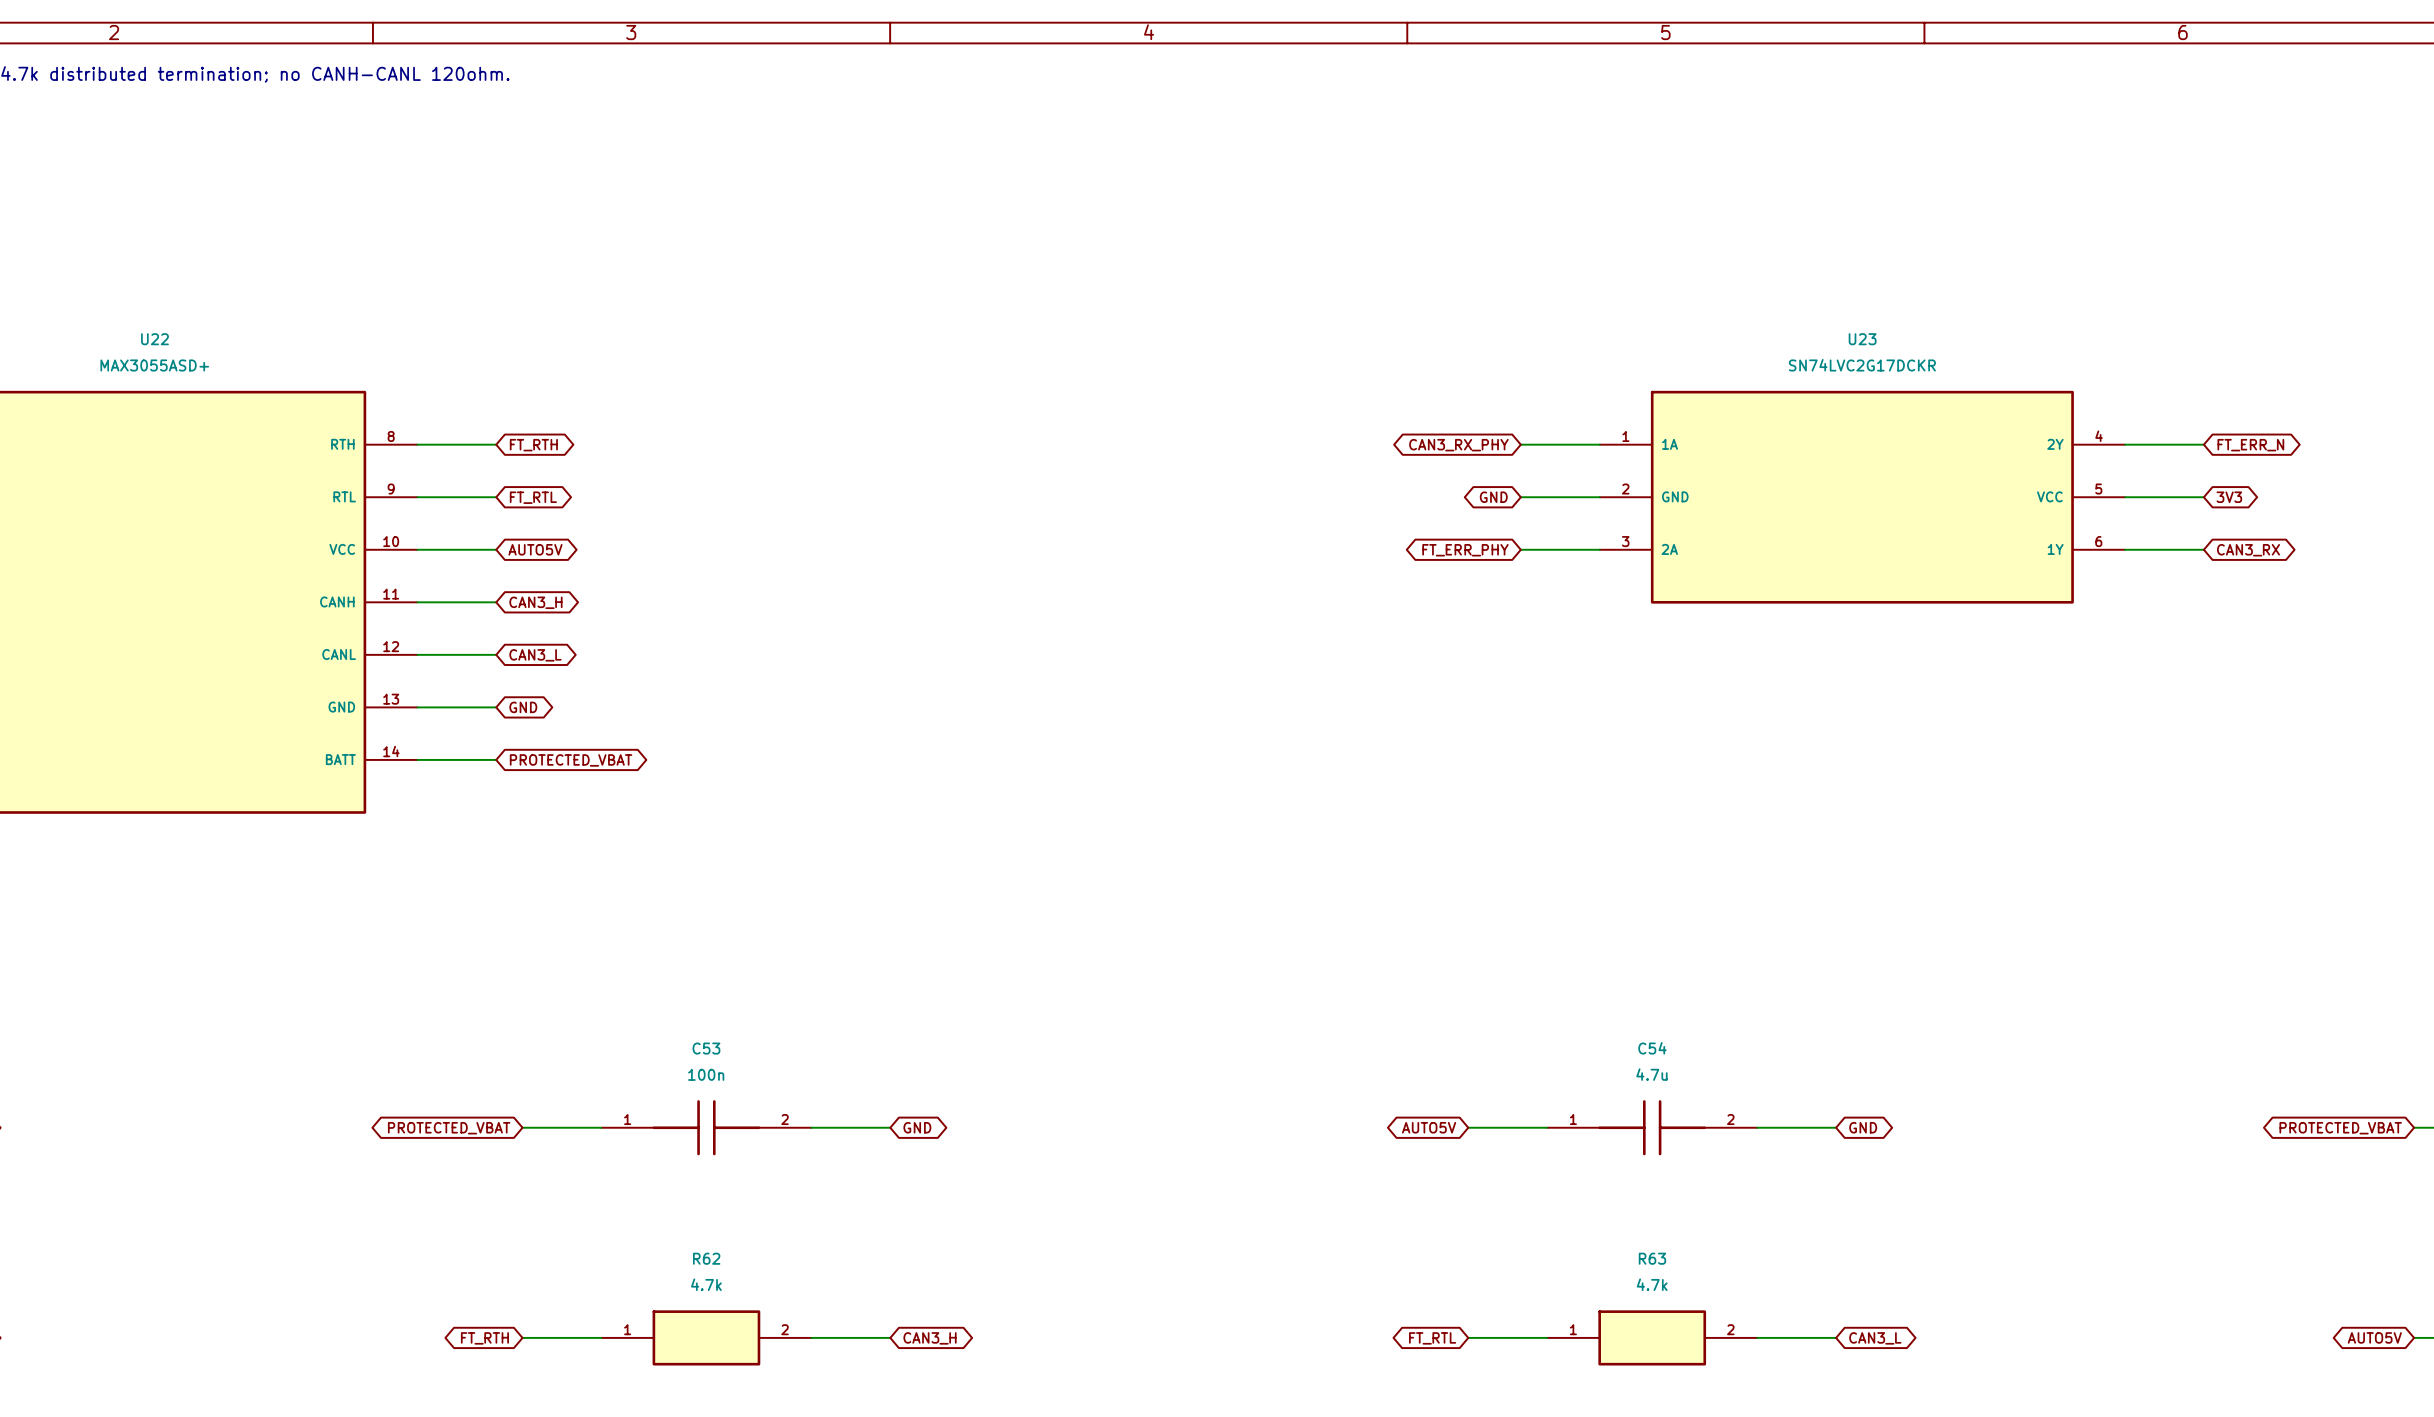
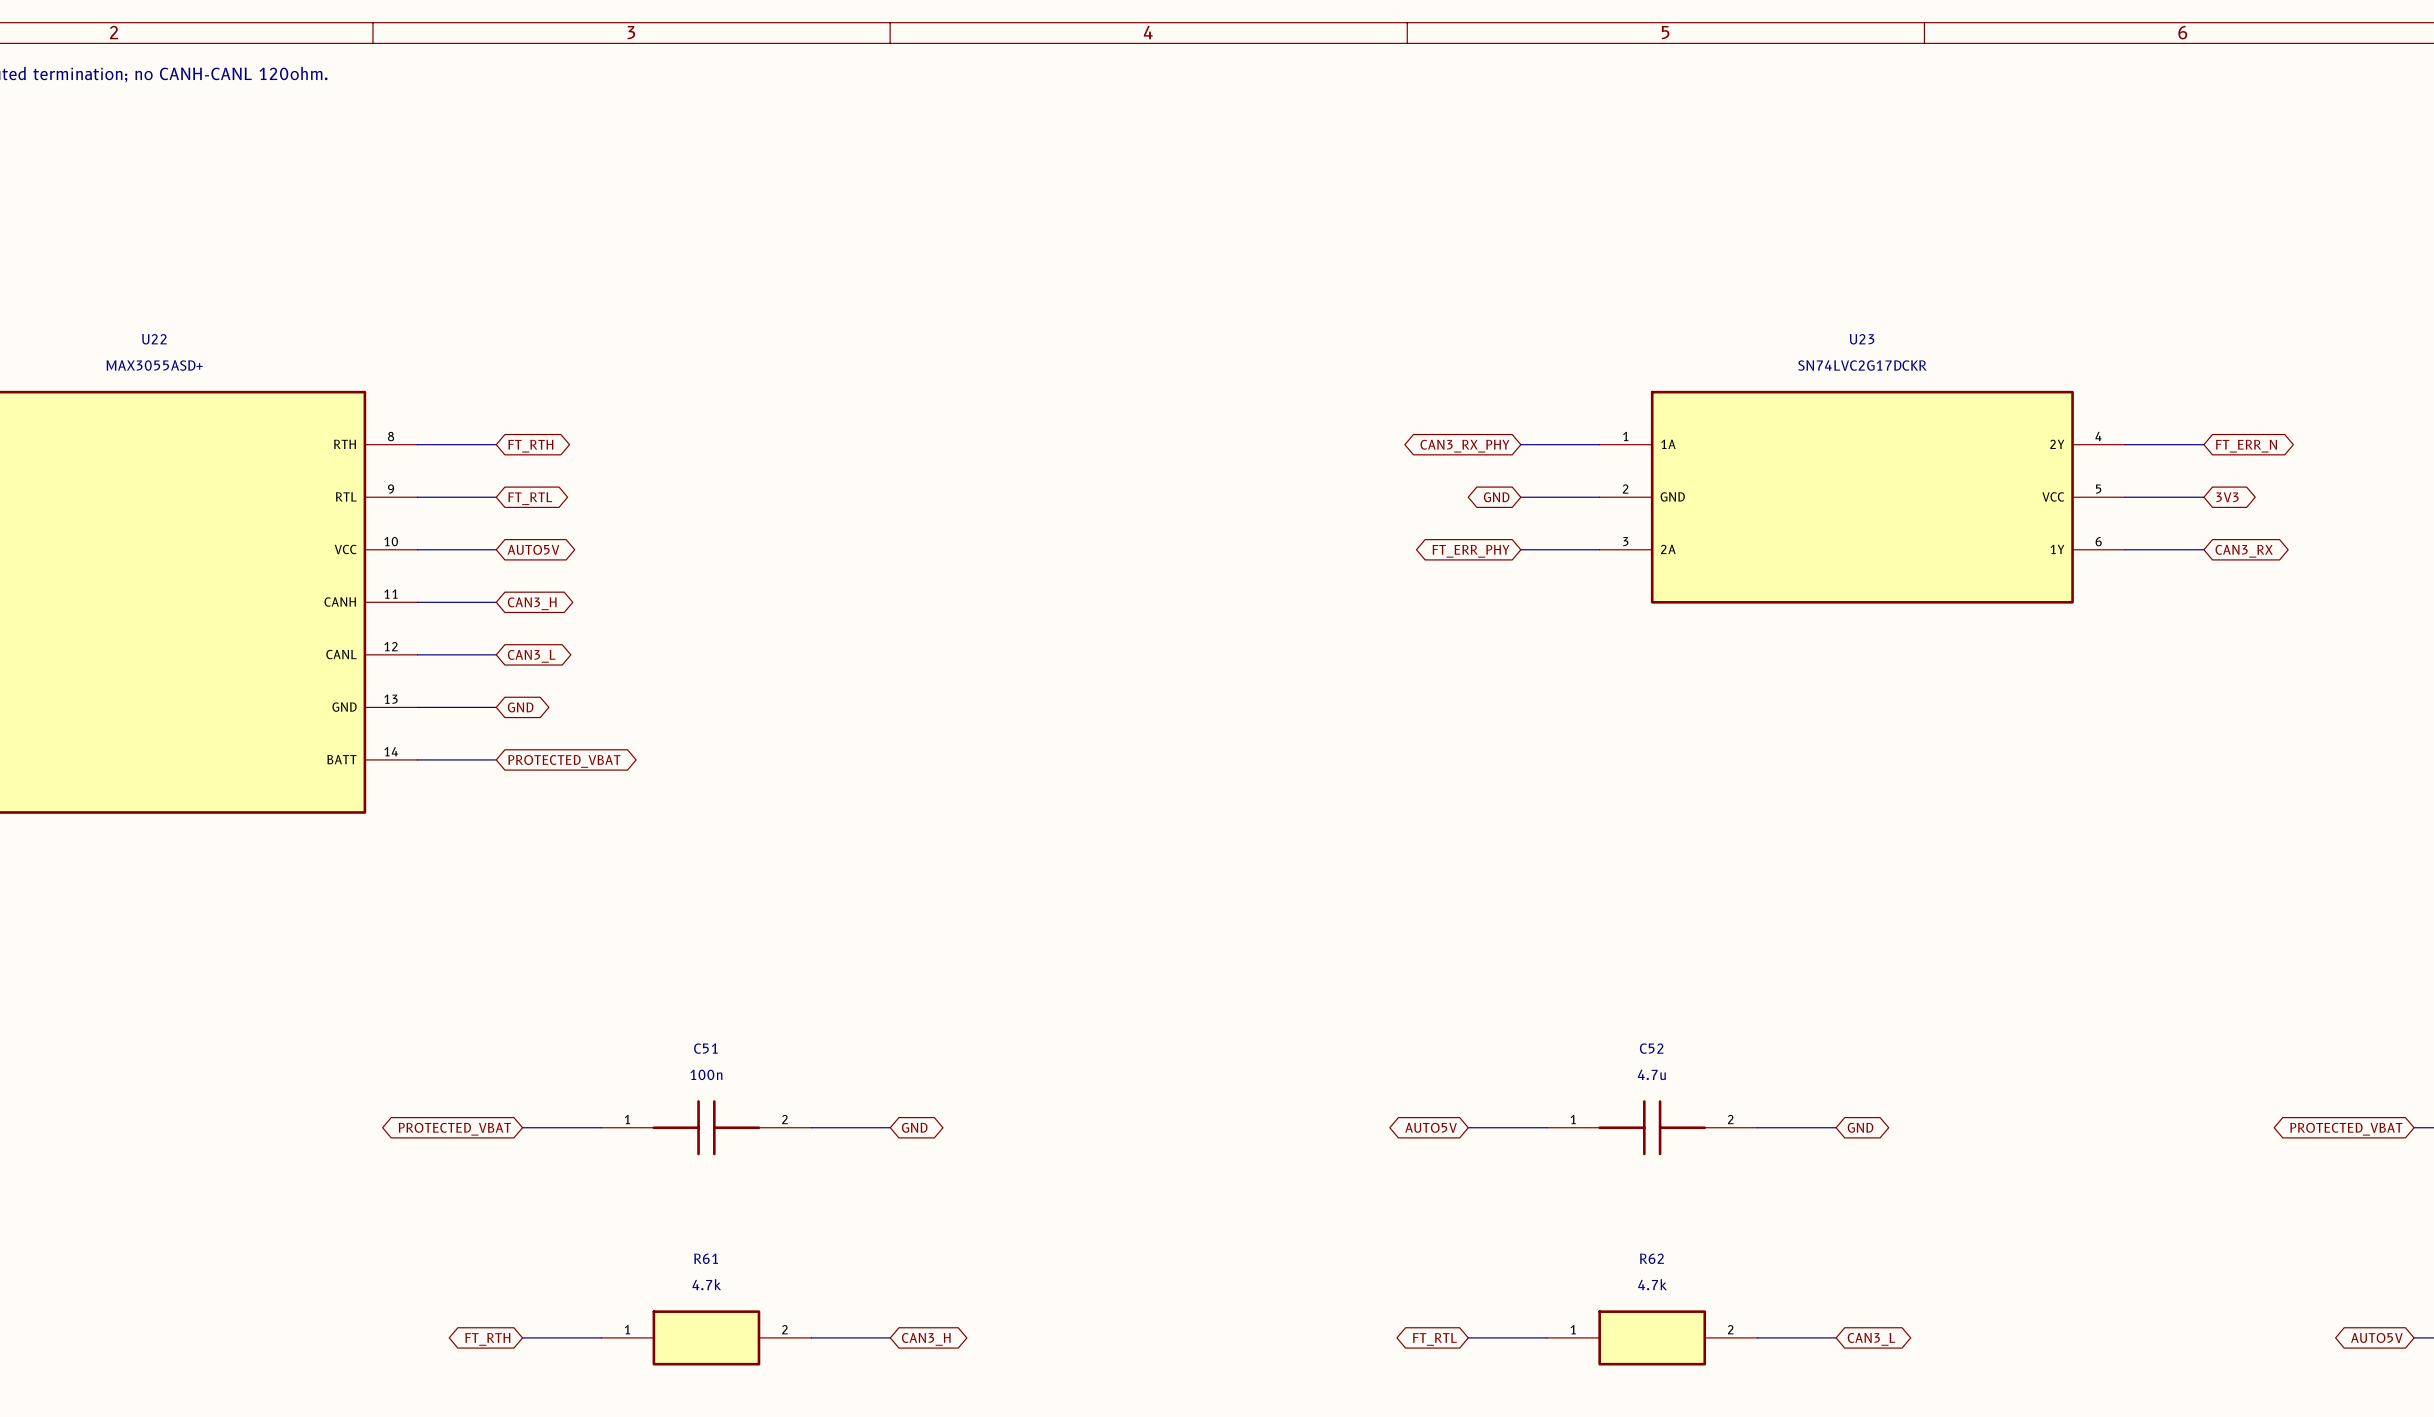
C53 name: C53 (706, 1048) -> C51 (705, 1048)
C54 name: C54 (1652, 1048) -> C52 (1651, 1048)
R62 name: R62 (706, 1258) -> R61 (706, 1258)
R63 name: R63 (1652, 1258) -> R62 (1651, 1258)

